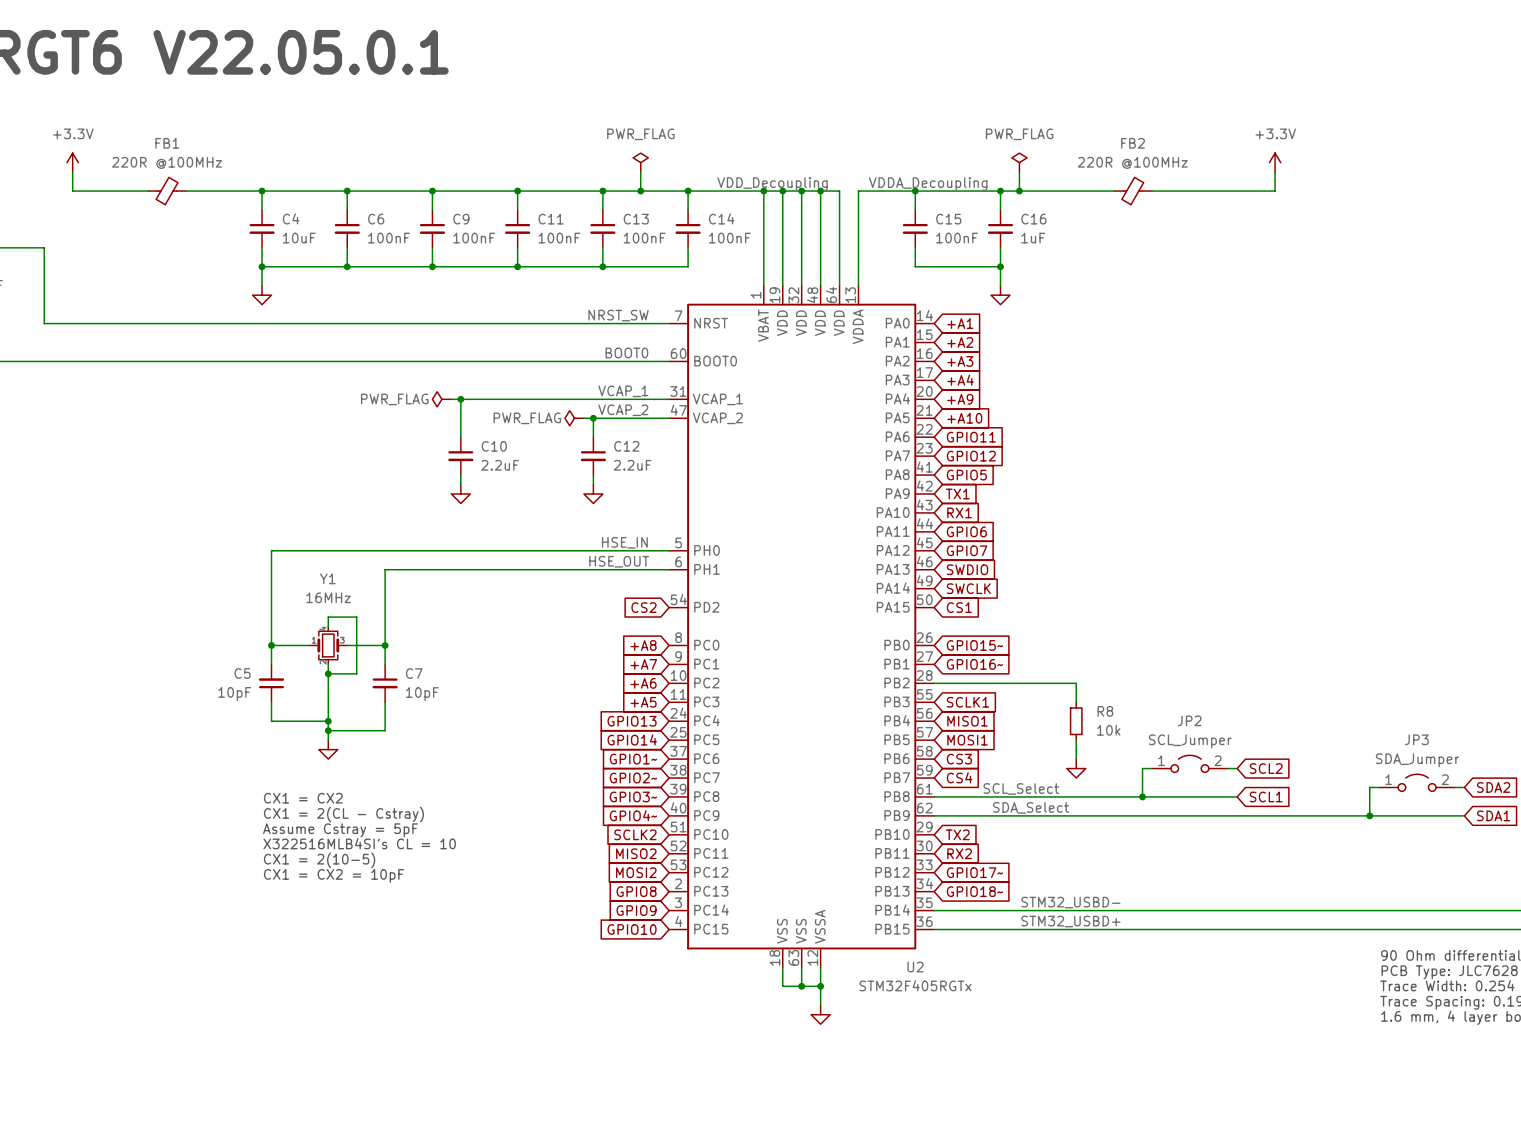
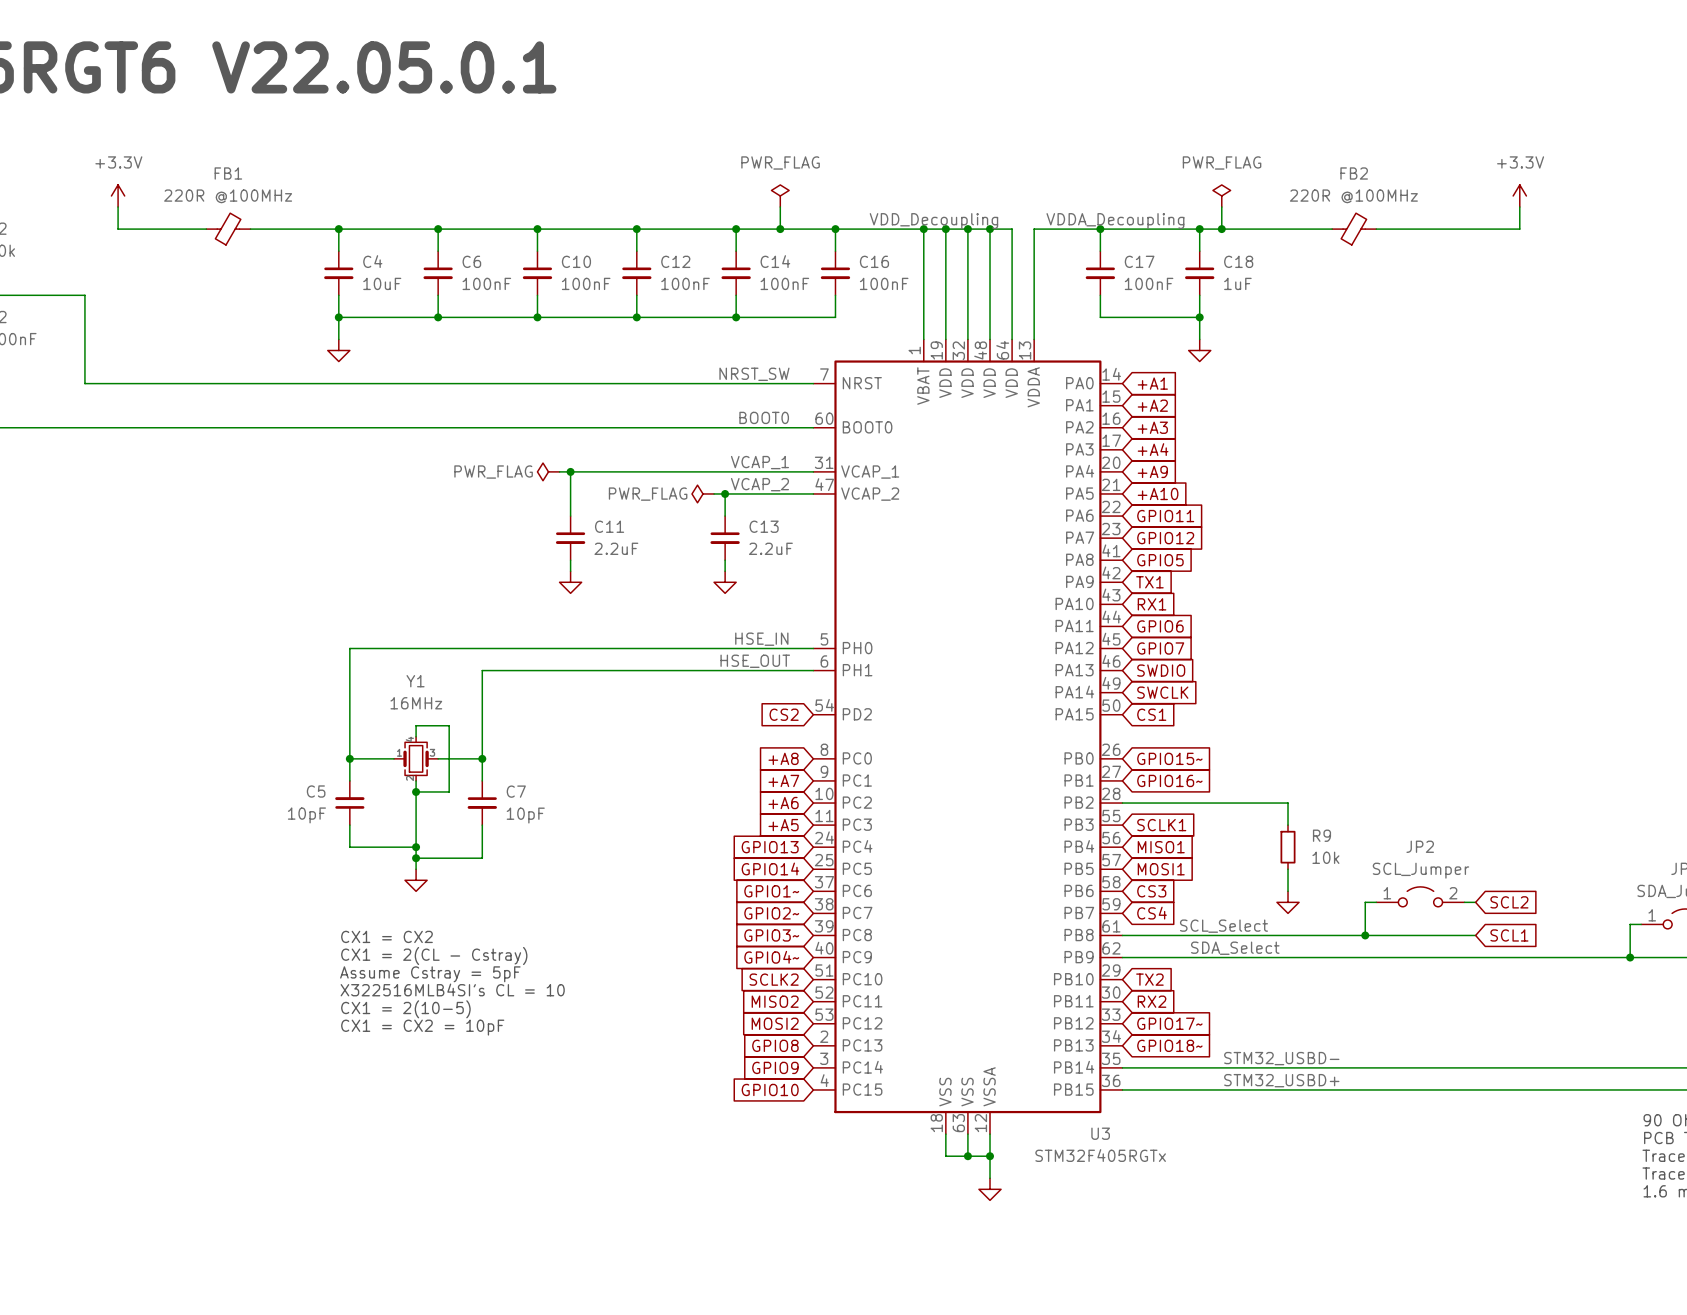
C14 name: C14 (721, 218) -> C16 (874, 261)
C9 name: C9 (461, 219) -> C10 (576, 261)
C11 name: C11 (551, 219) -> C12 (675, 261)
C13 name: C13 (636, 219) -> C14 (775, 261)
C15 name: C15 (948, 219) -> C17 (1139, 261)
C16 name: C16 (1033, 219) -> C18 (1238, 261)
C10 name: C10 (494, 446) -> C11 (609, 526)
C12 name: C12 (626, 446) -> C13 (764, 526)
R8 name: R8 (1105, 711) -> R9 (1321, 835)
U2 name: U2 (915, 967) -> U3 (1100, 1133)

